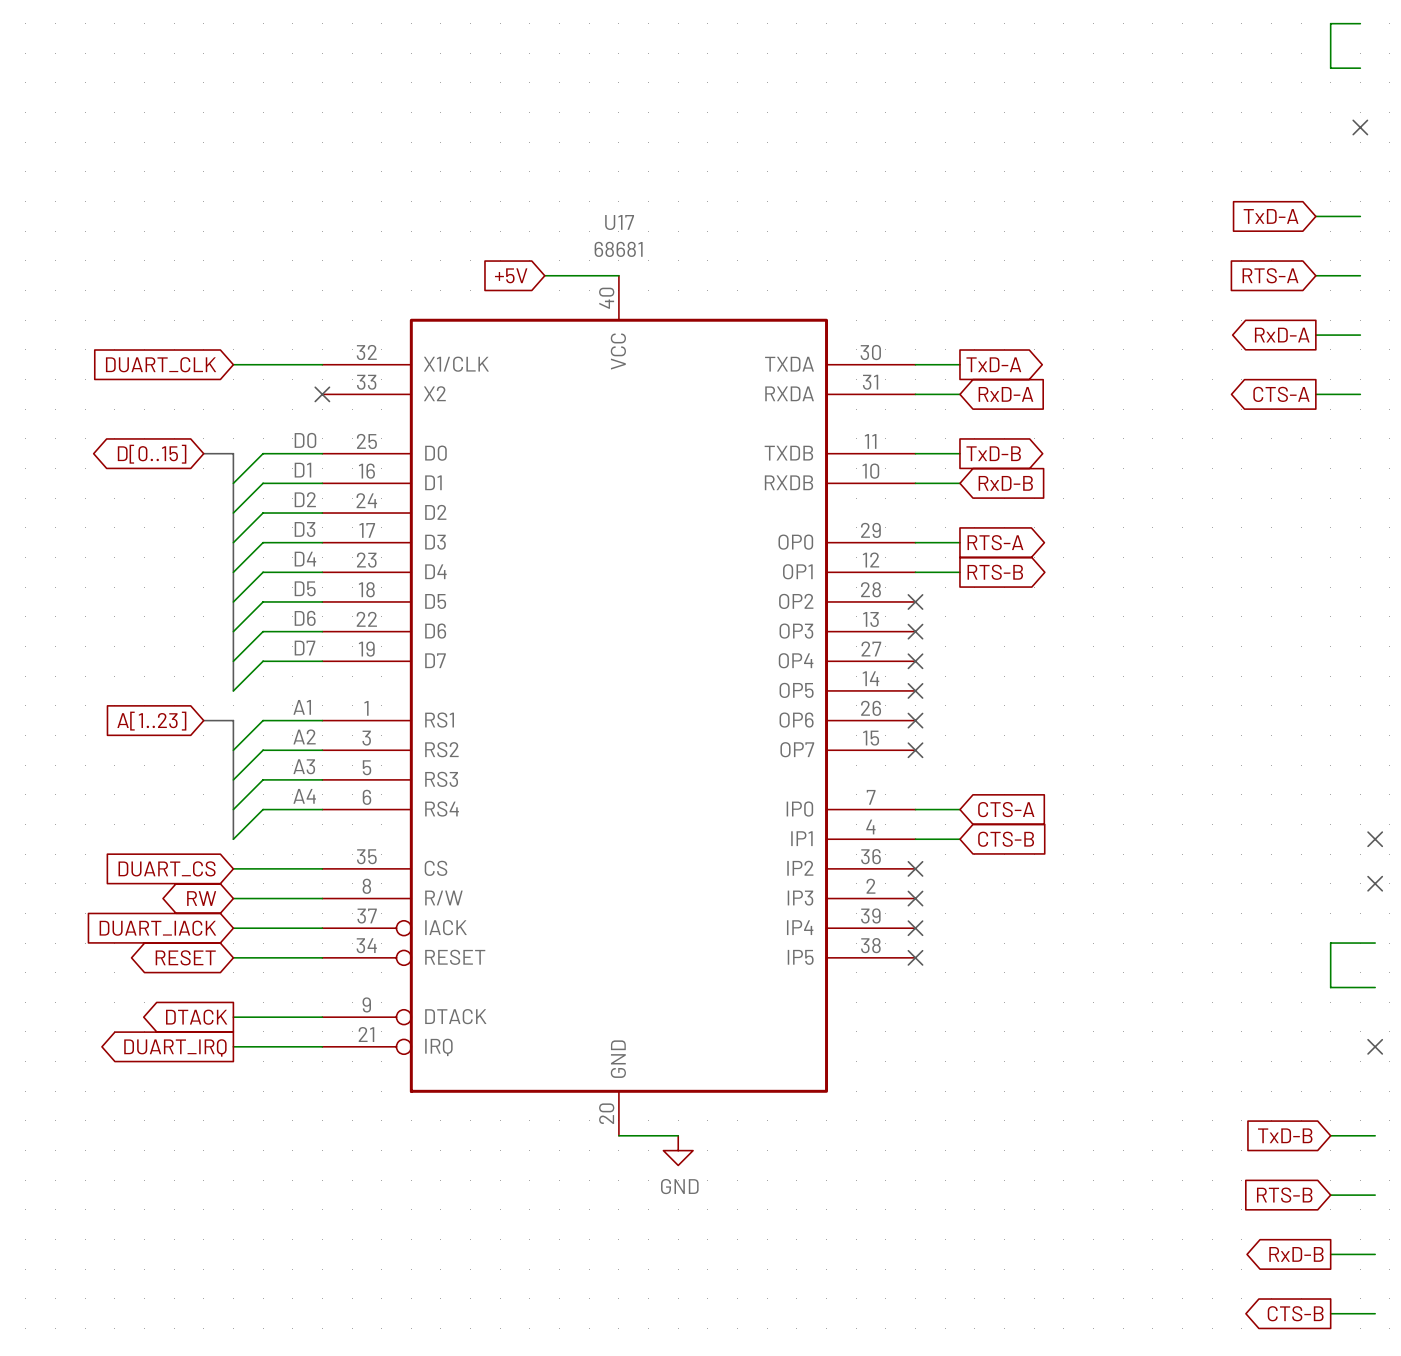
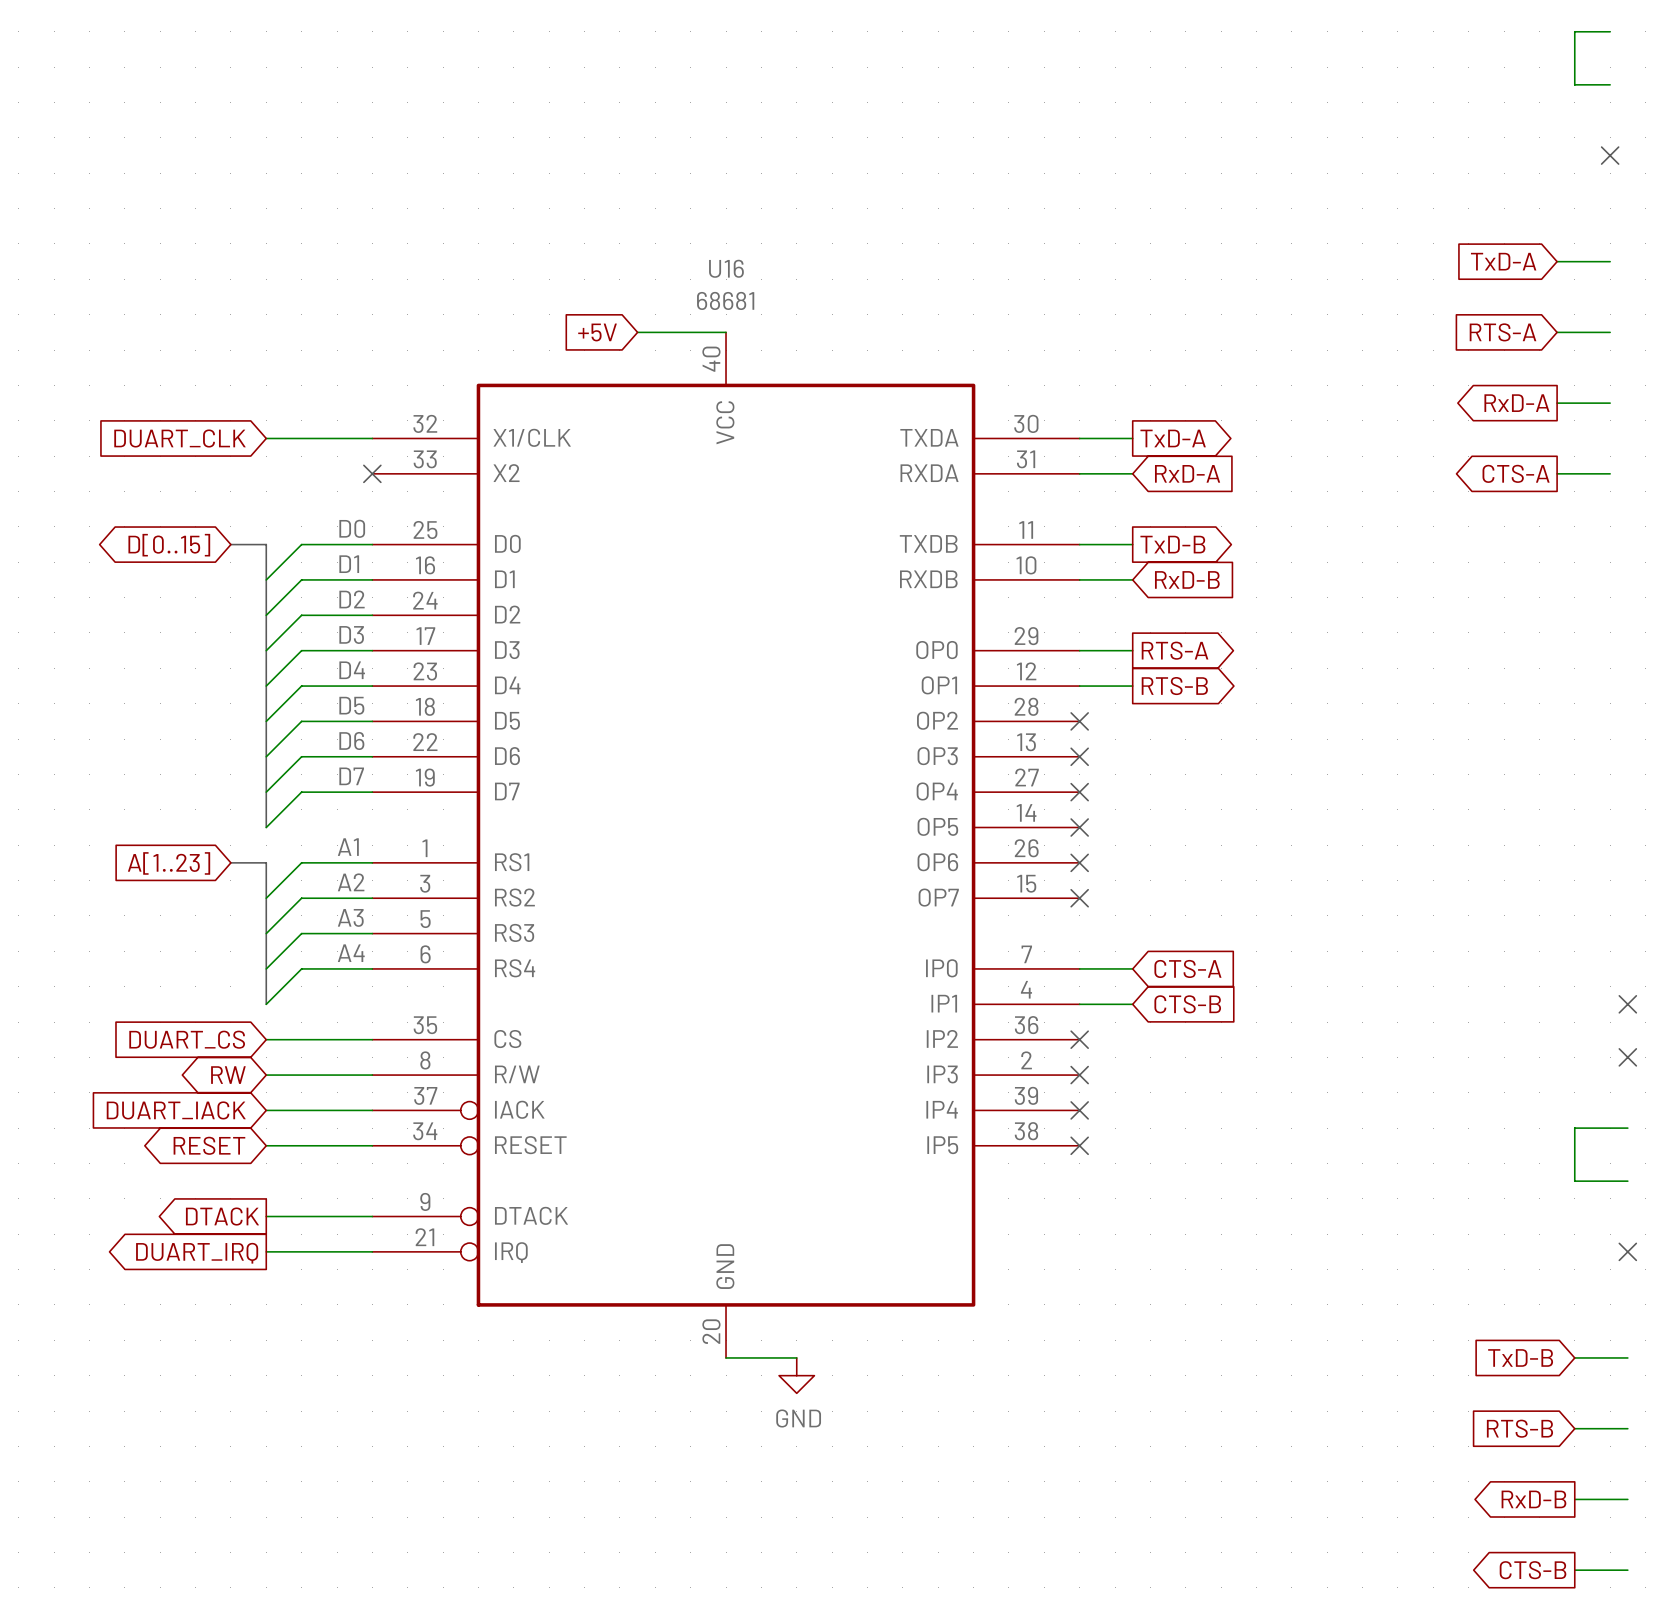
U17 name: U17 (619, 222) -> U16 (726, 268)

